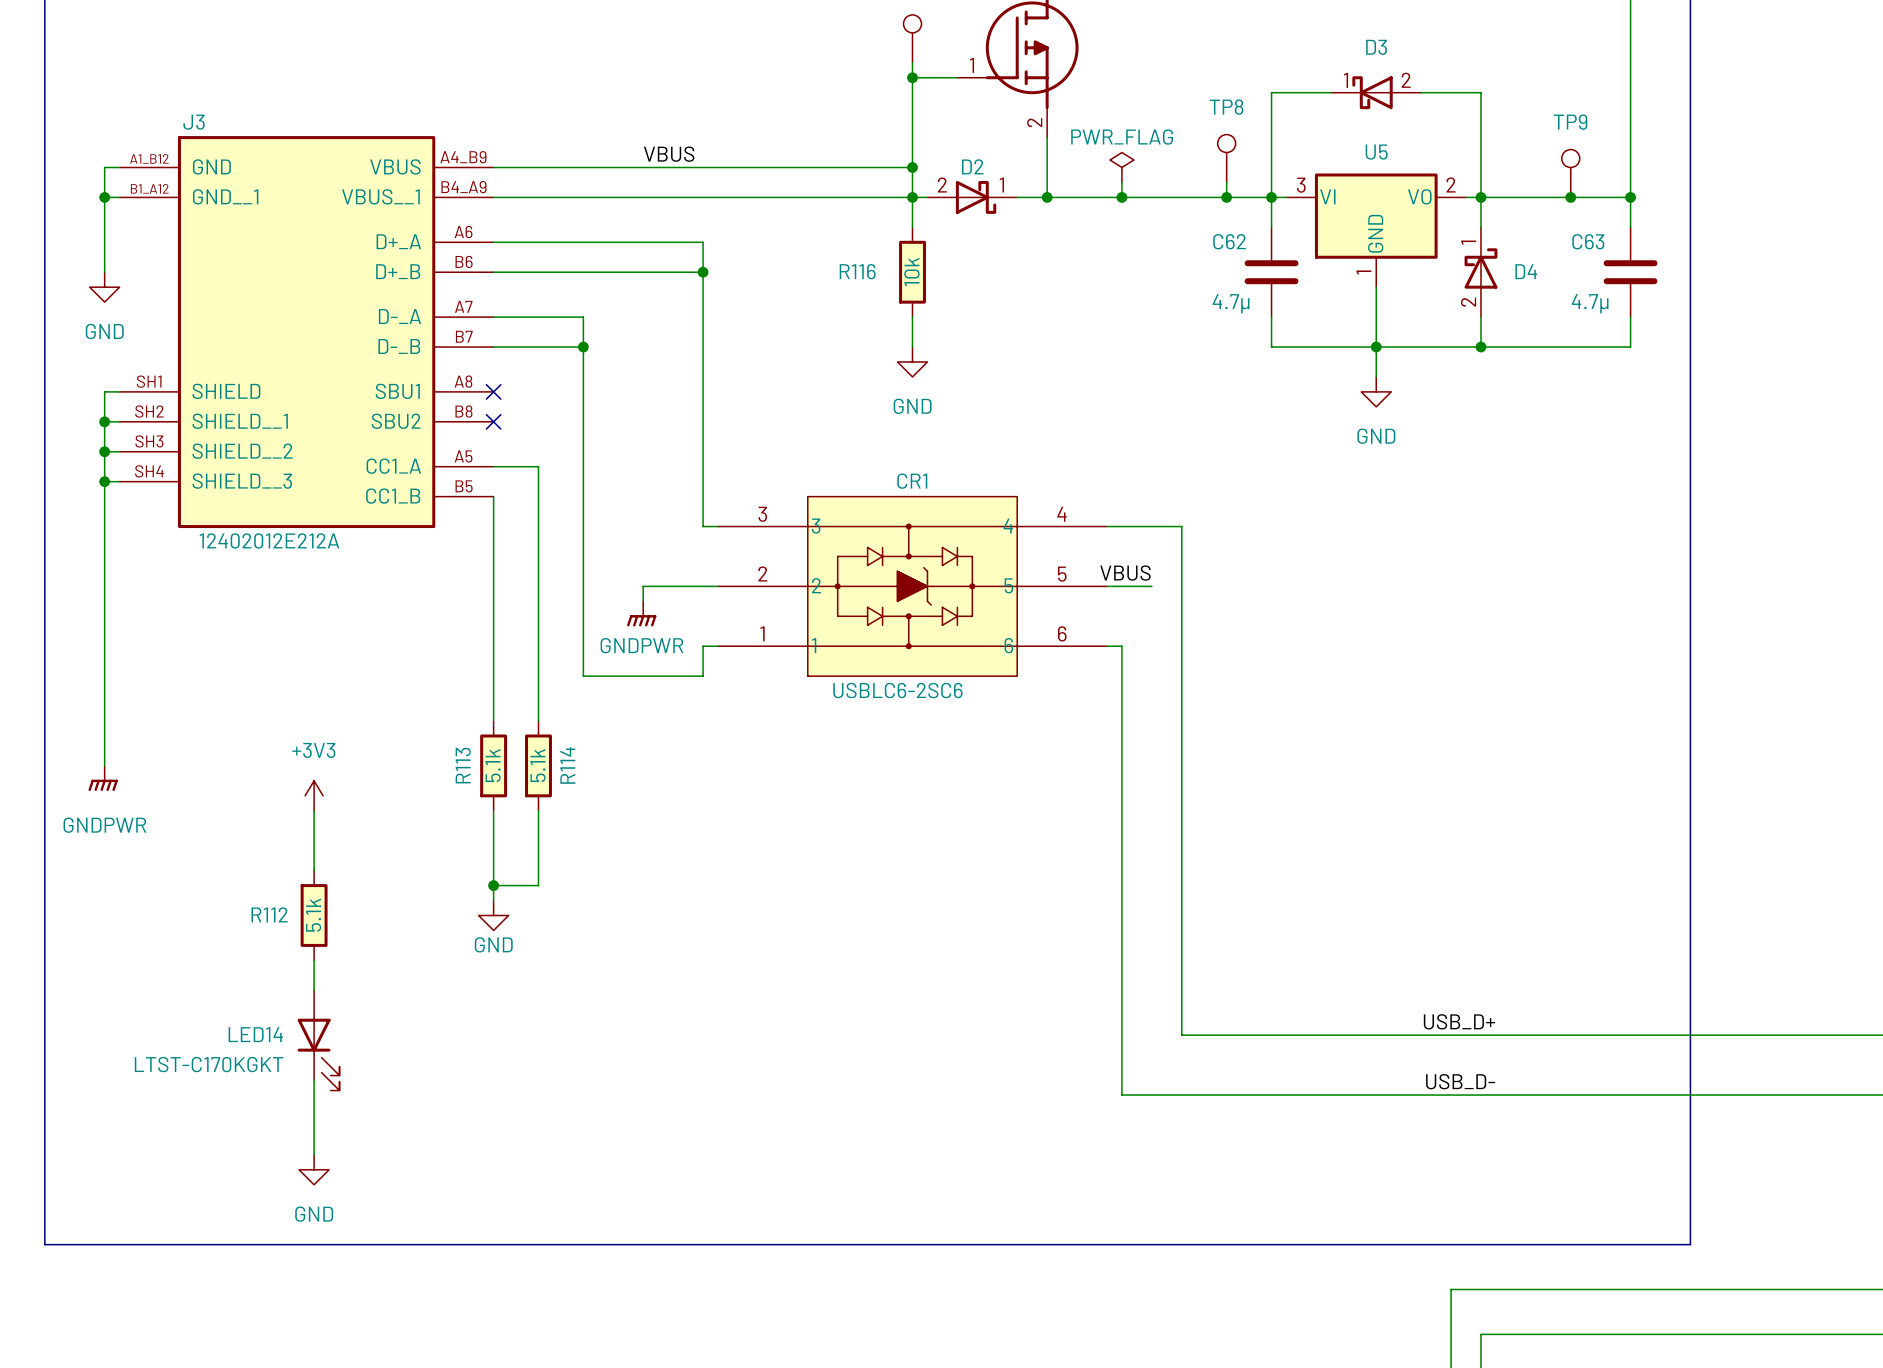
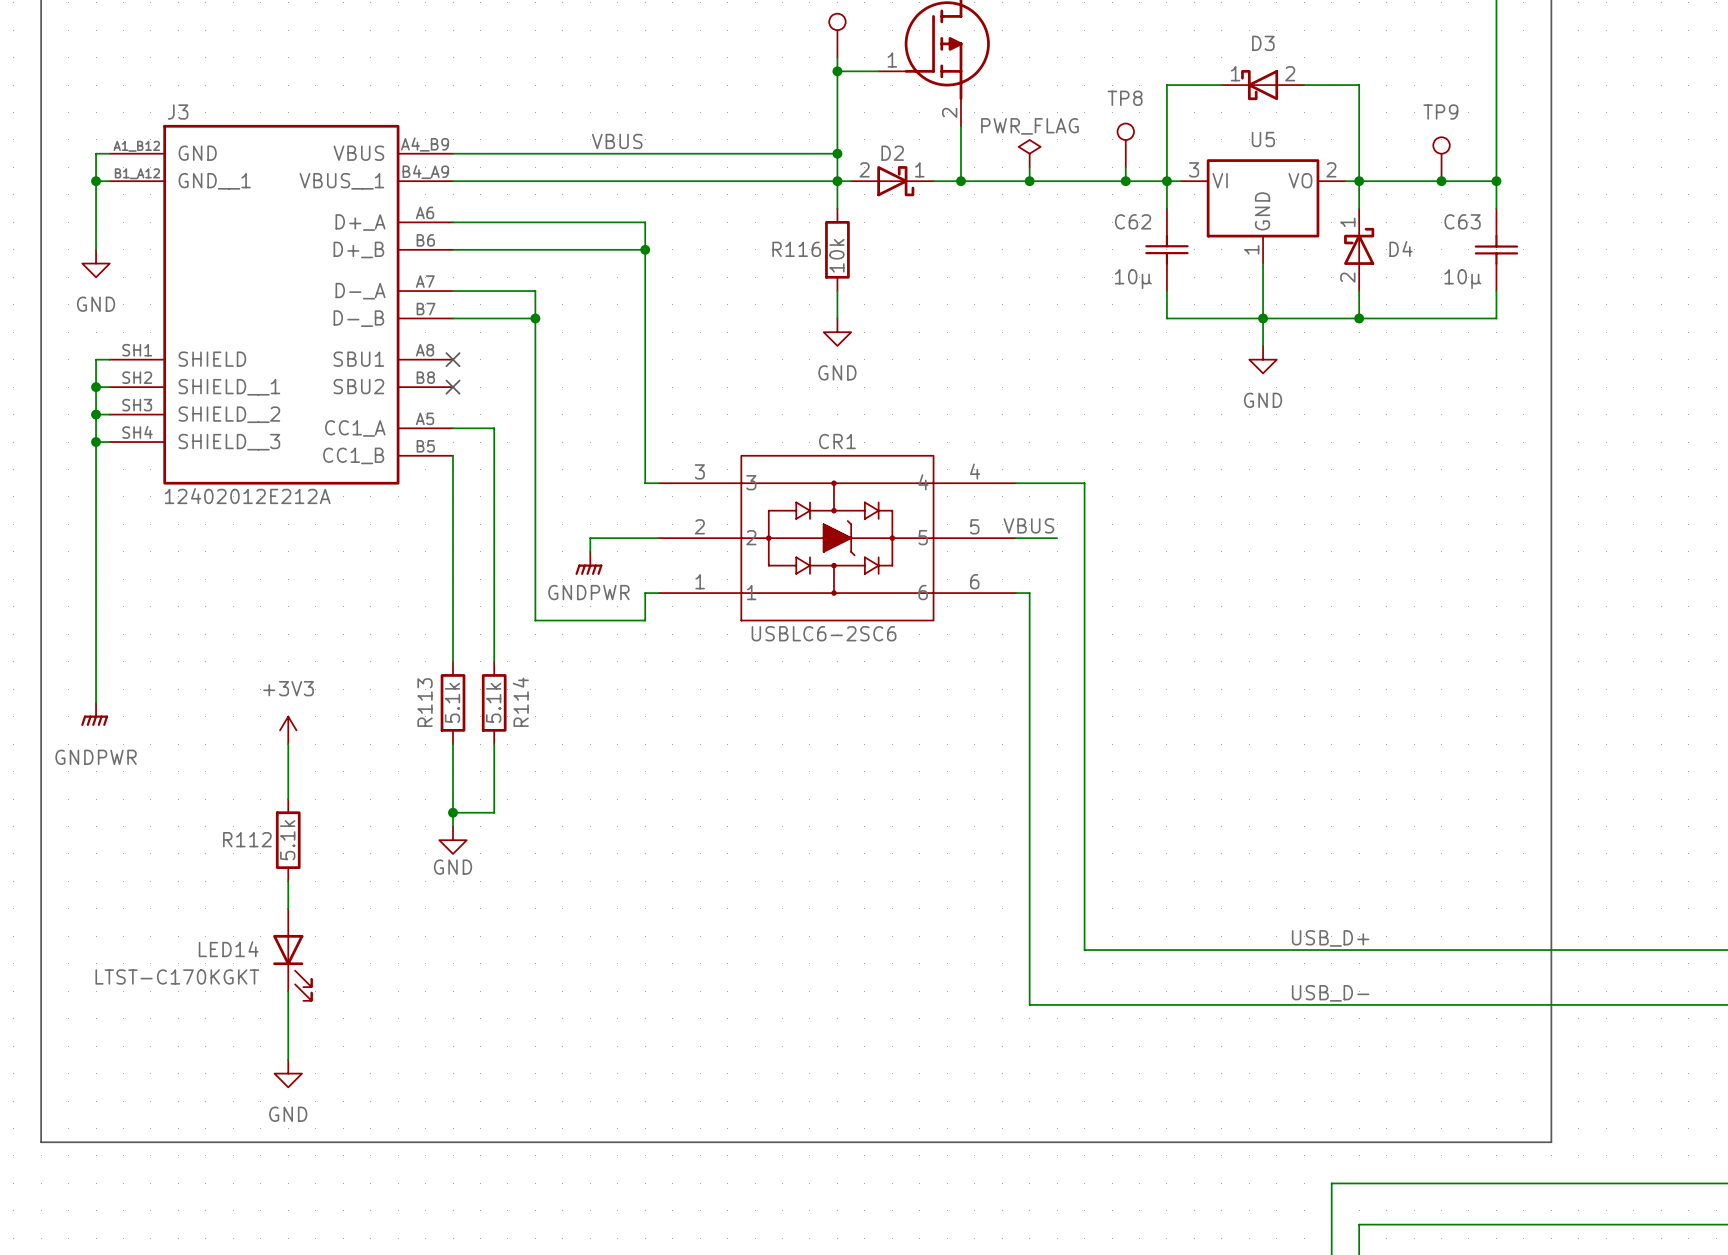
C62 symbol: [1244, 227, 1299, 318] -> [1145, 208, 1189, 292]
C63 symbol: [1603, 227, 1658, 318] -> [1474, 208, 1519, 292]
C62 value: 4.7µ (1231, 303) -> 10µ (1133, 279)
C63 value: 4.7µ (1590, 303) -> 10µ (1462, 279)

